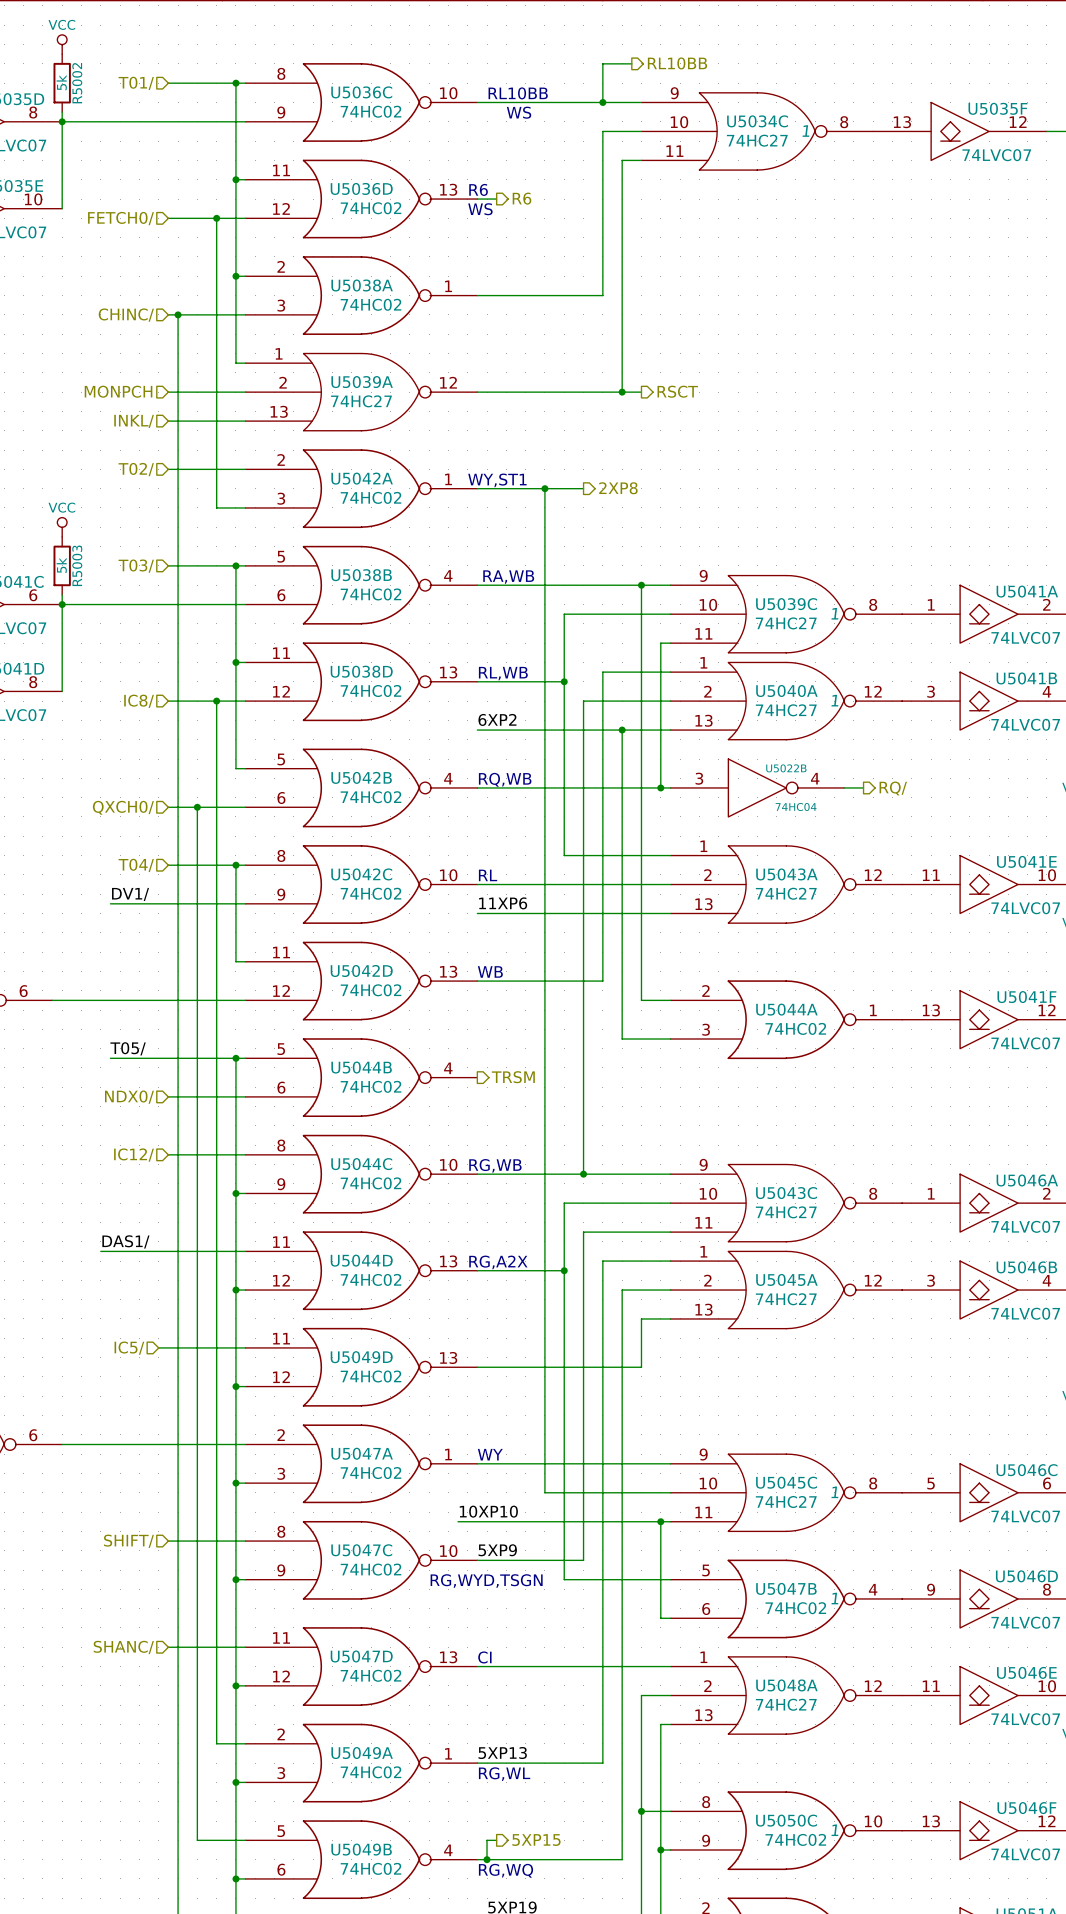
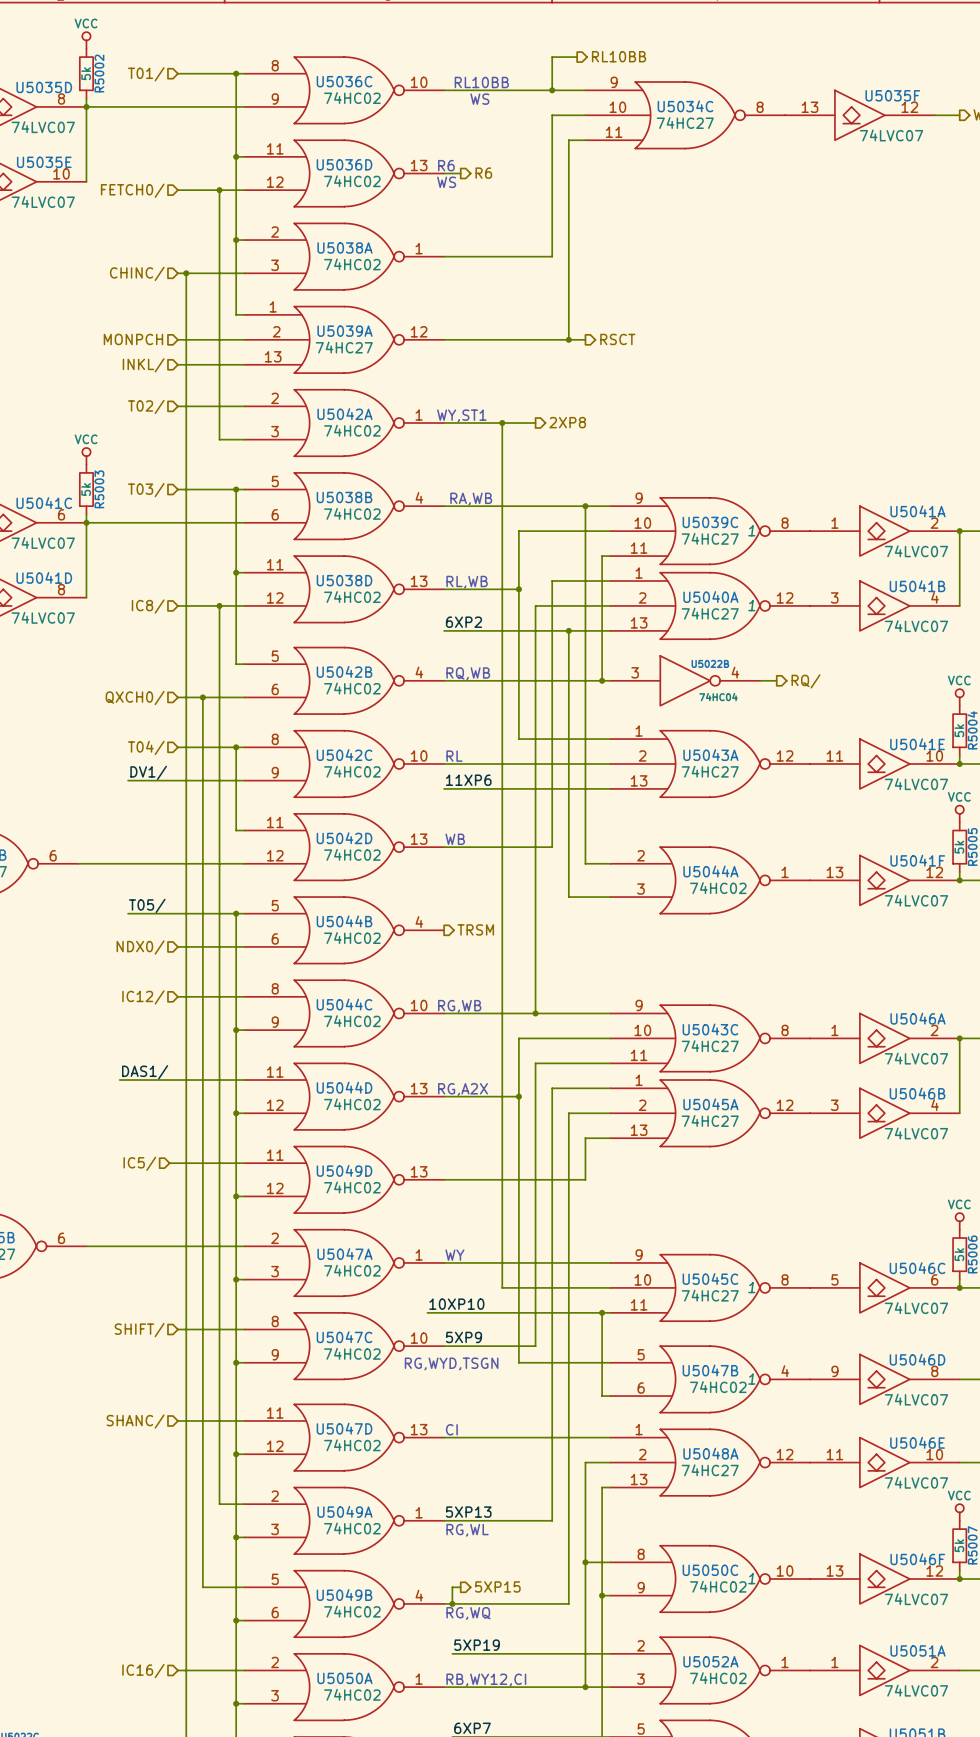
U5034C text: 1 (805, 131) -> none

